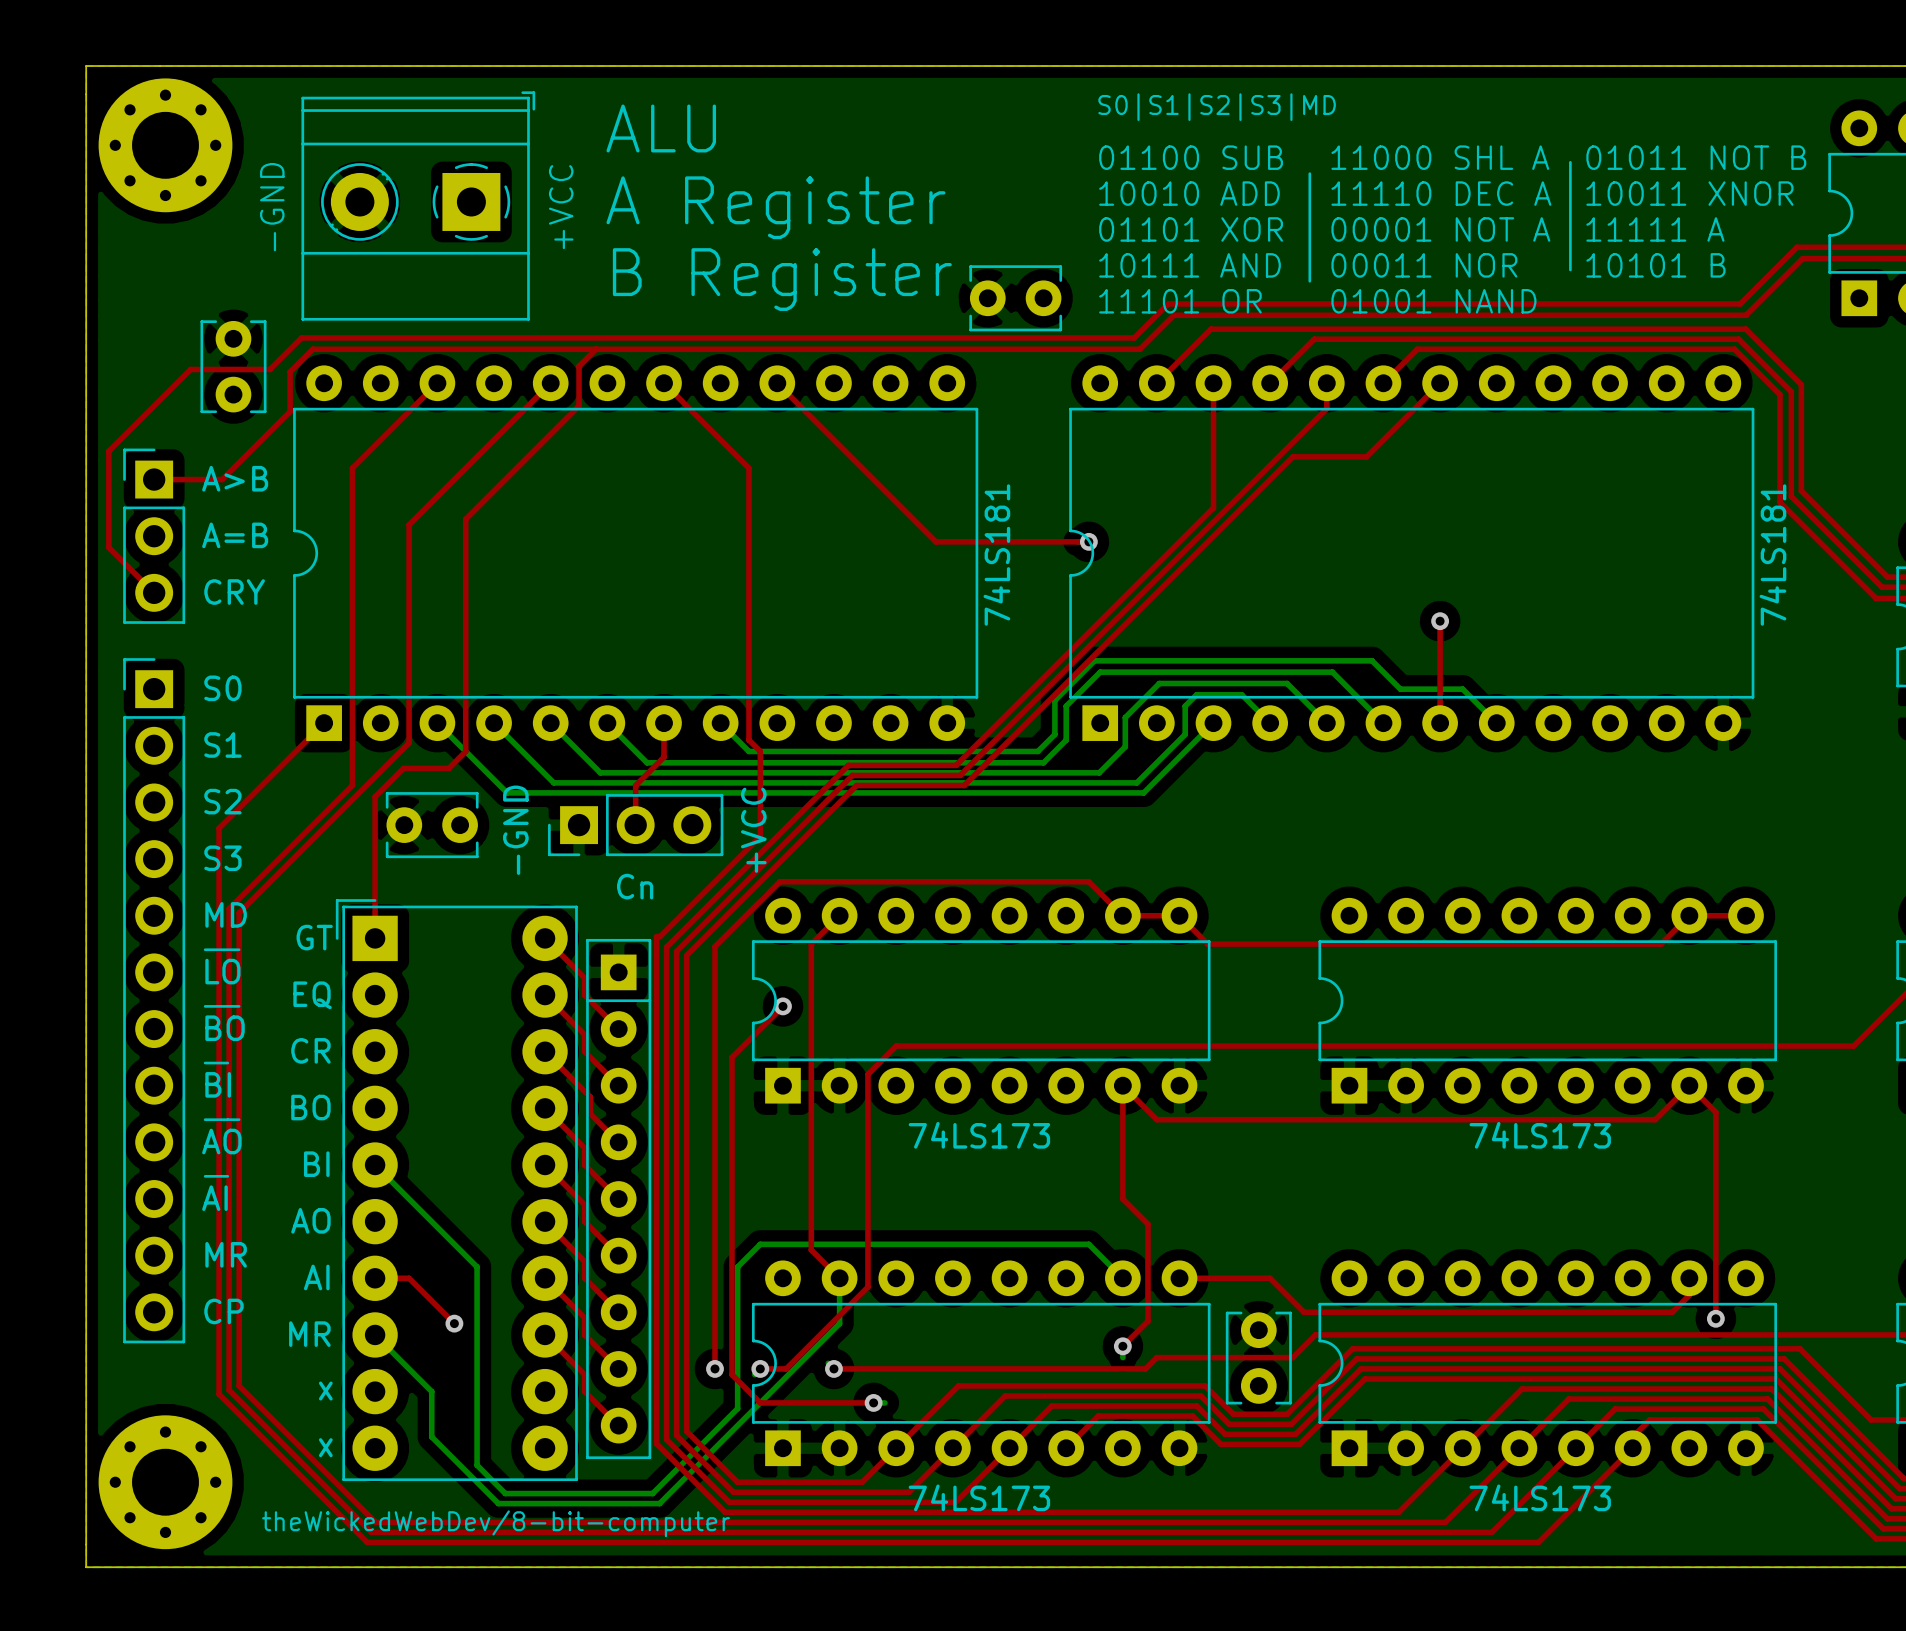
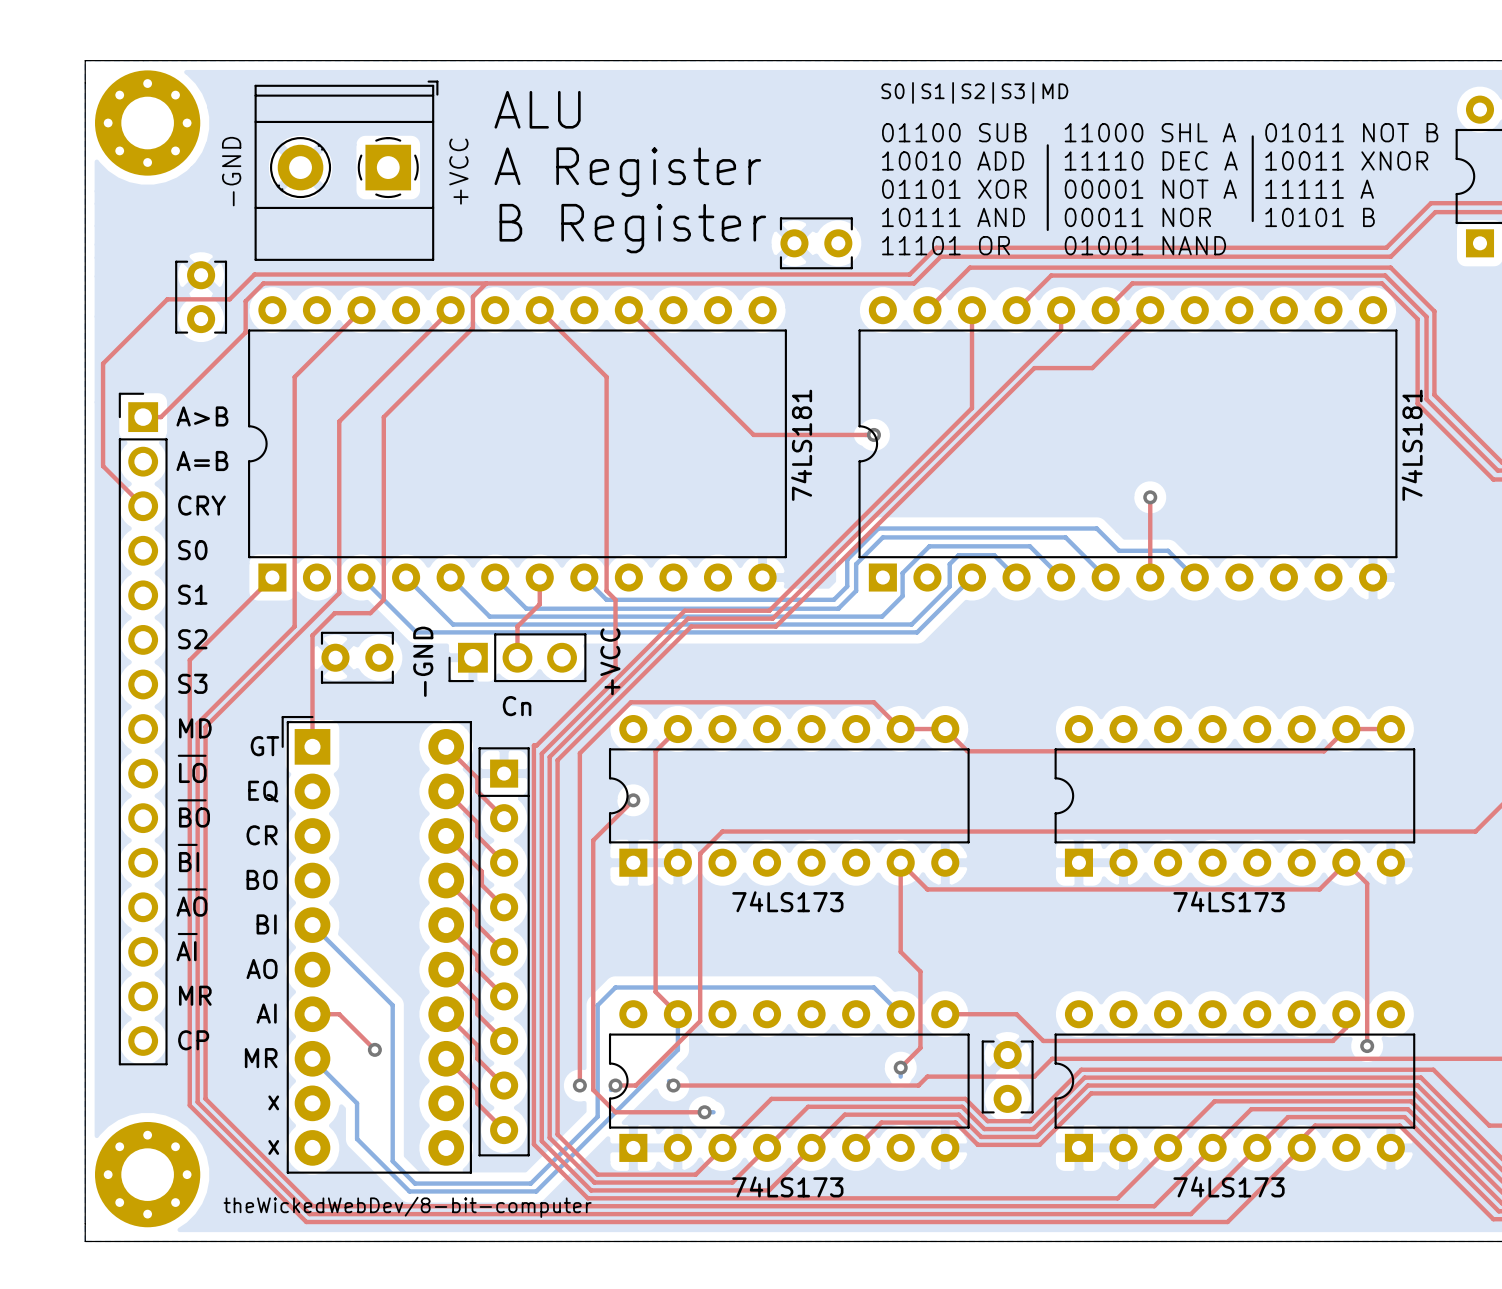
text: A>B (235, 478) -> none
top track: (154, 479) (222, 479) -> (143, 417) (161, 417) (192, 385)
text: A=B (235, 535) -> A>B (202, 416)
part: (154, 536) -> none
top track: (108, 547) (154, 592) -> (103, 439) (103, 466) (143, 506)
text: CRY (234, 592) -> A=B (202, 461)
text: none -> CRY (201, 505)
part: none -> (143, 729)
part: (154, 1000) -> none

